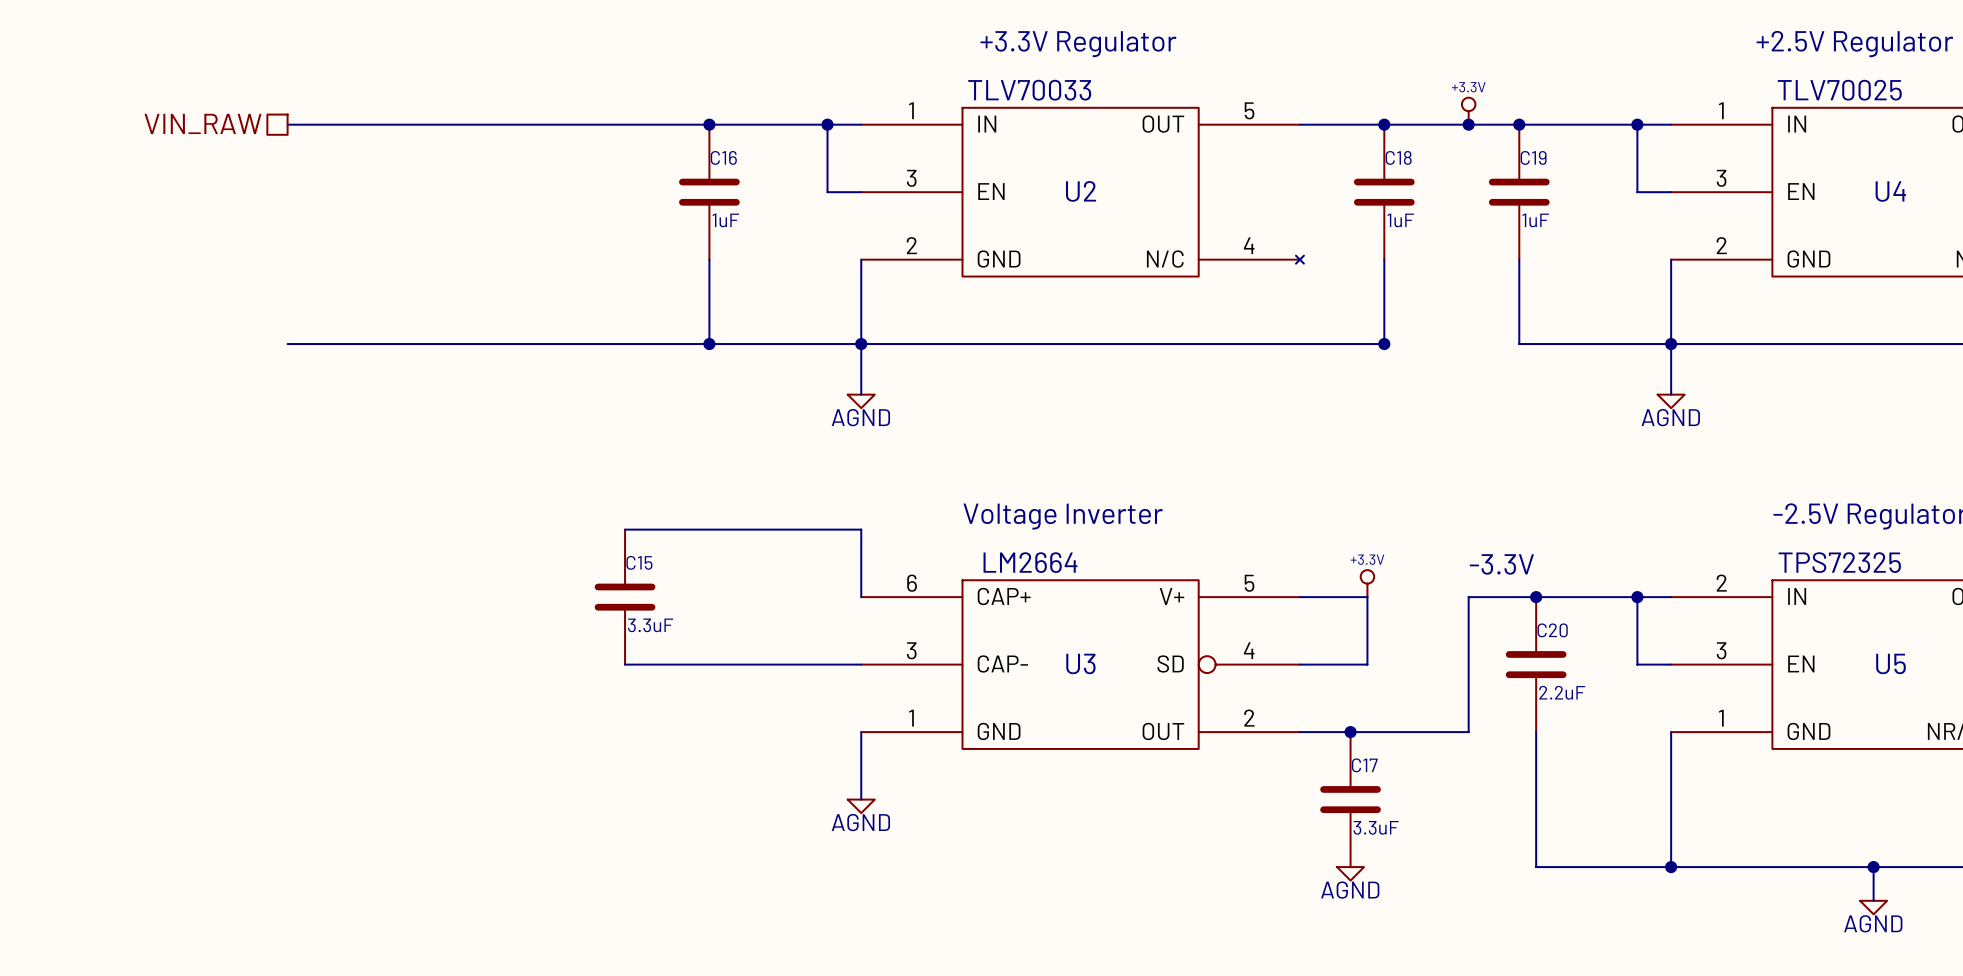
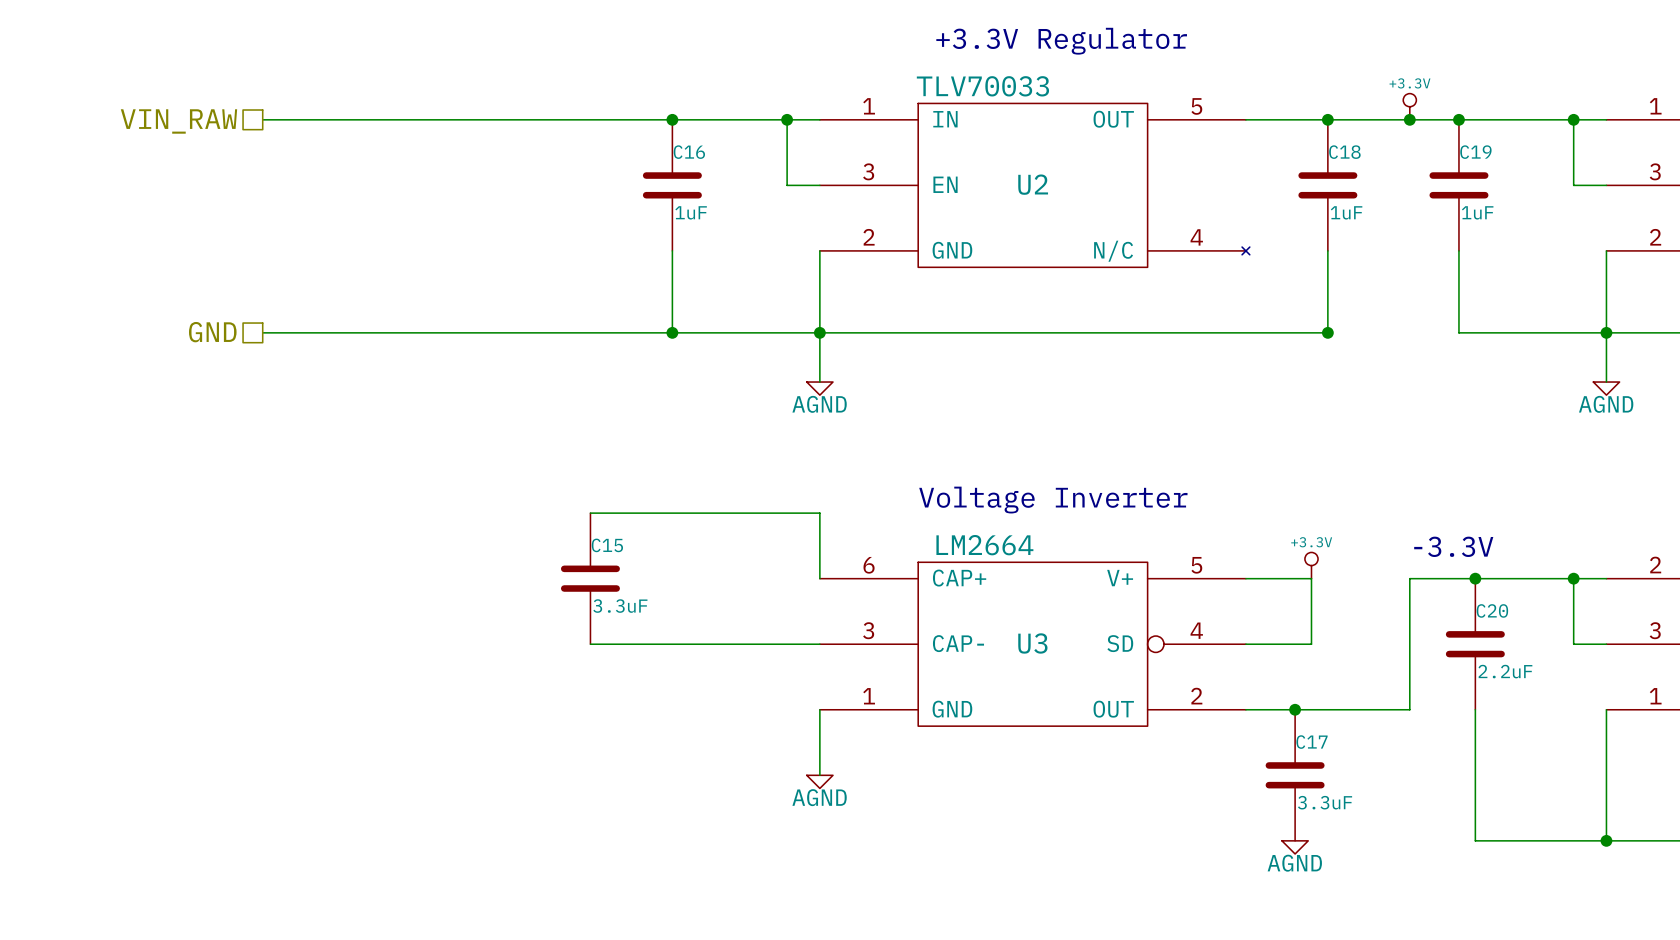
hierarchical label: none -> GND (212, 332)

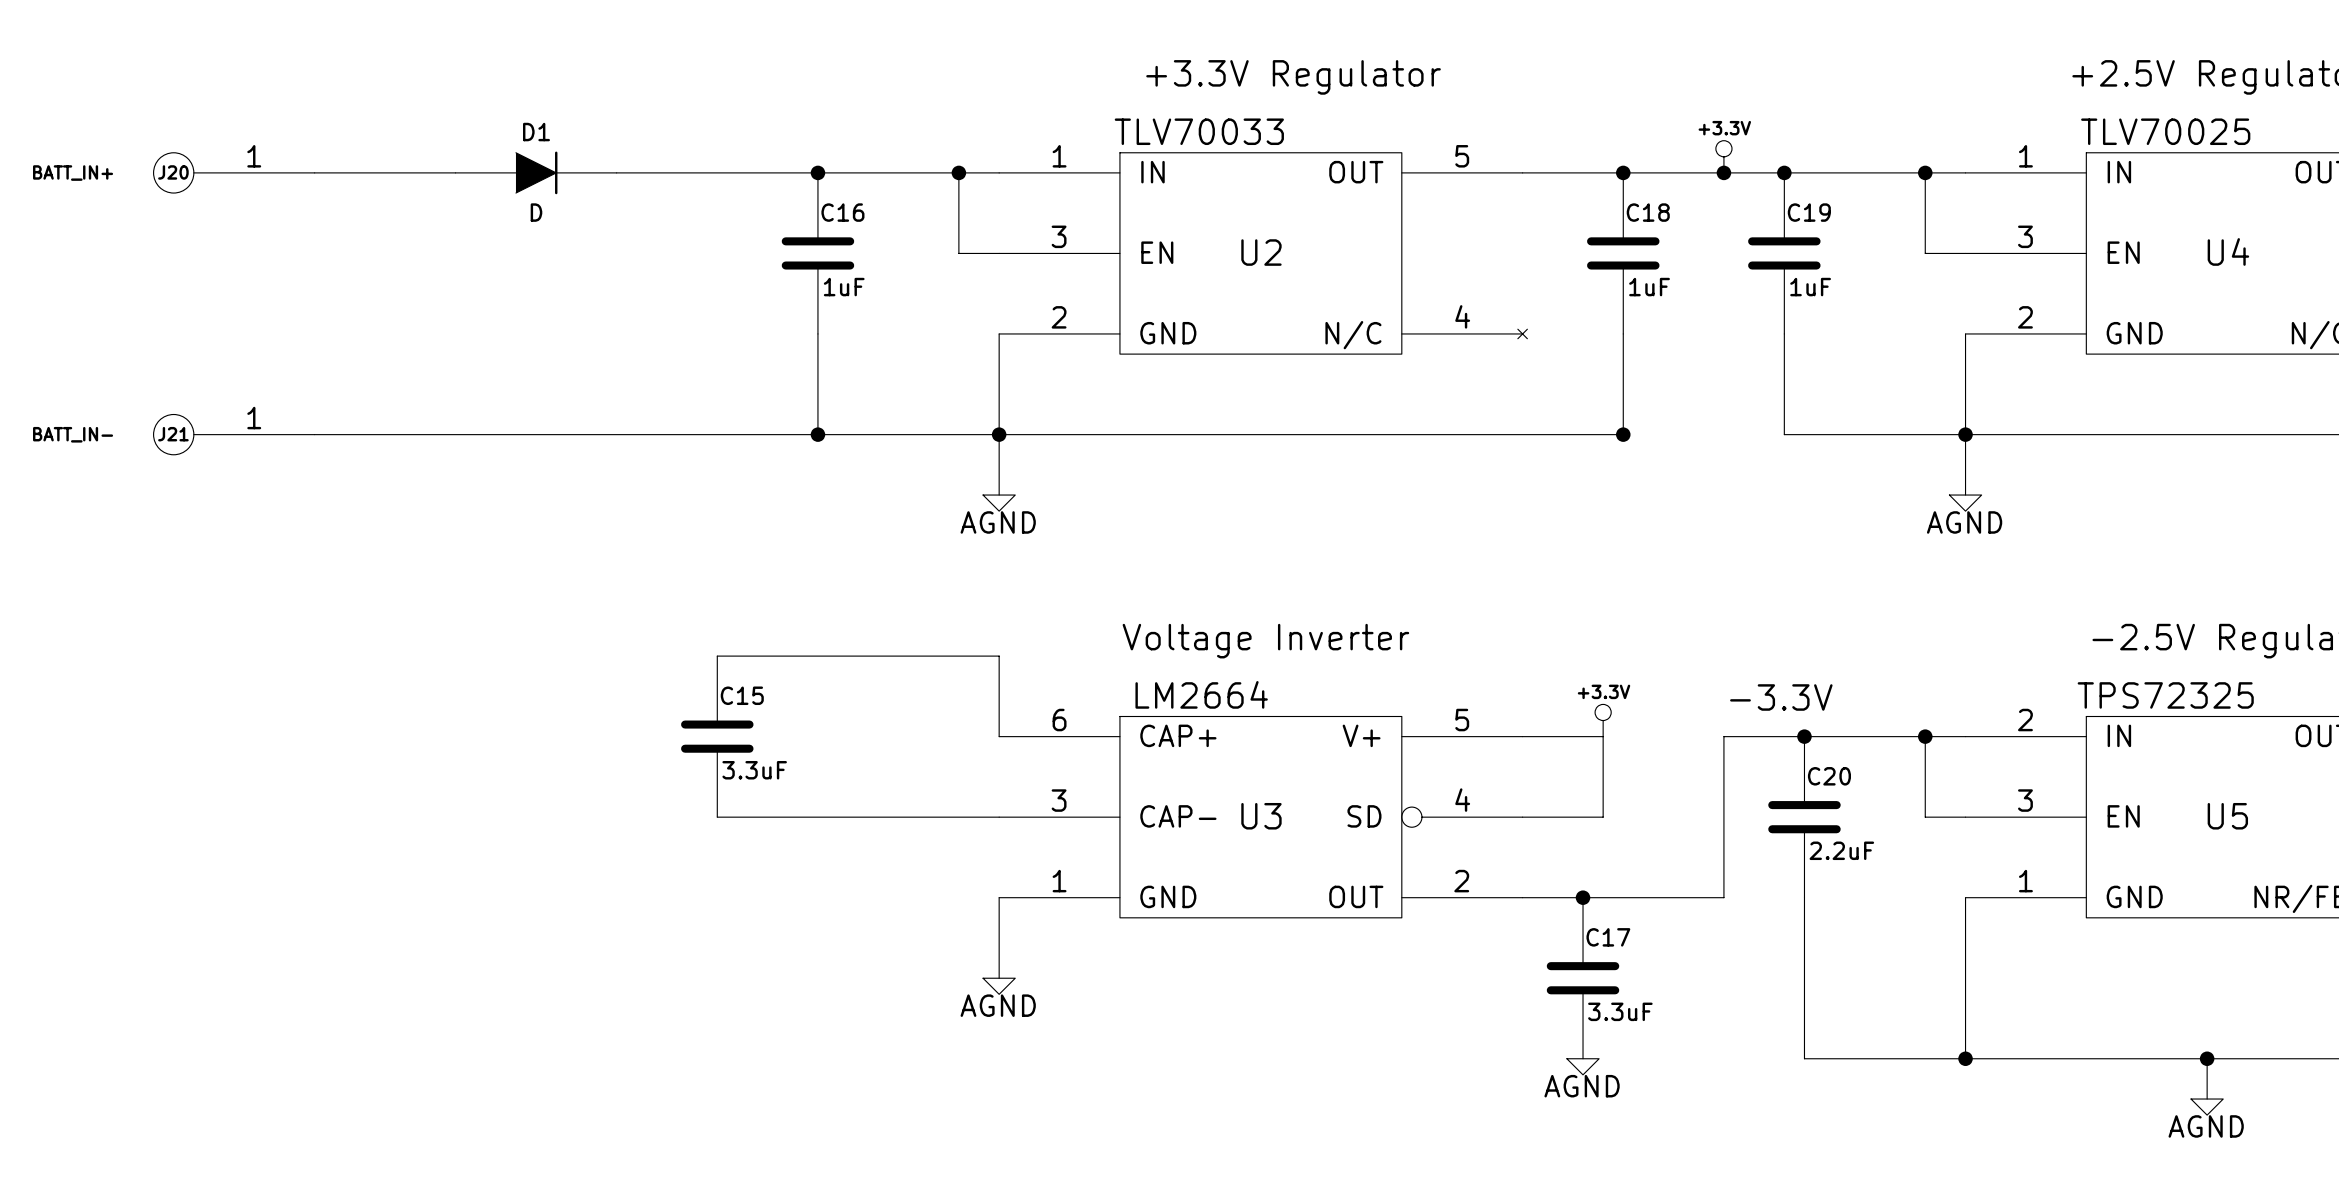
J20: none -> BATT_IN+ (234, 172)
D1: none -> D (536, 172)
hierarchical label: VIN_RAW (178, 121) -> none
J21: none -> BATT_IN- (234, 434)
hierarchical label: GND (212, 332) -> none

